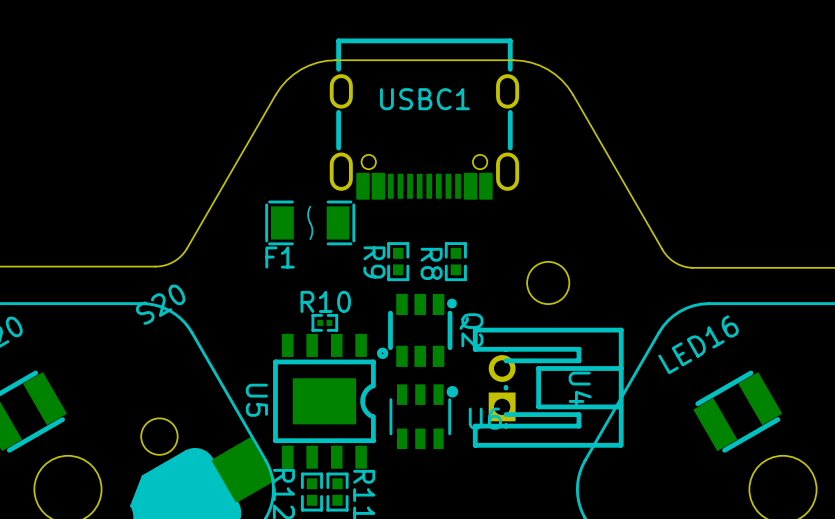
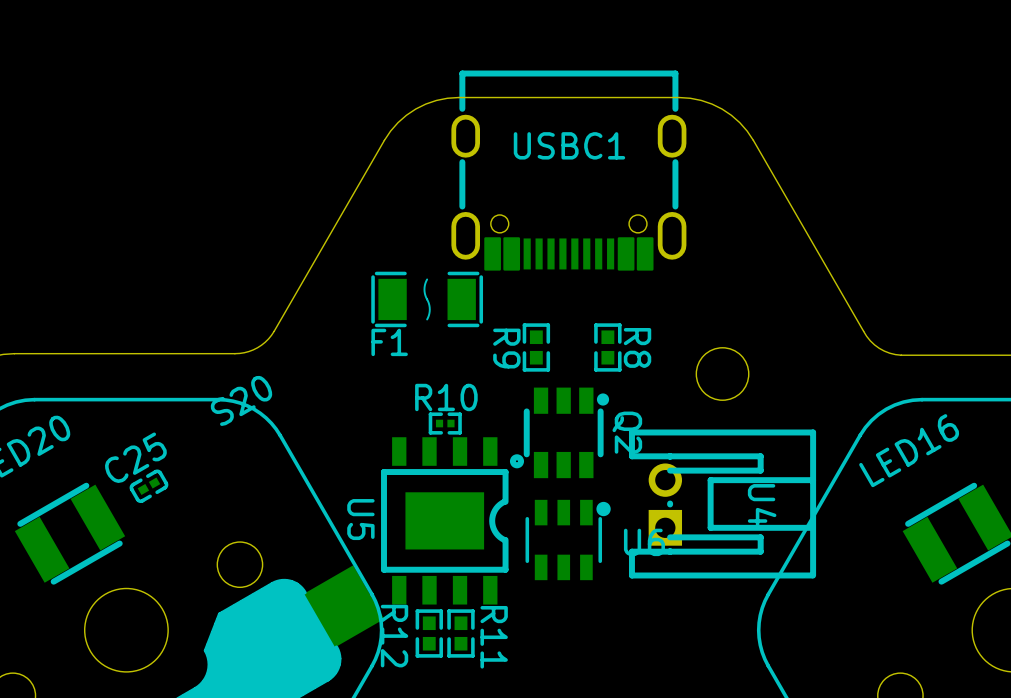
R8 name position: R8 (431, 263) -> R8 (637, 347)
C25: none -> (148, 486)

